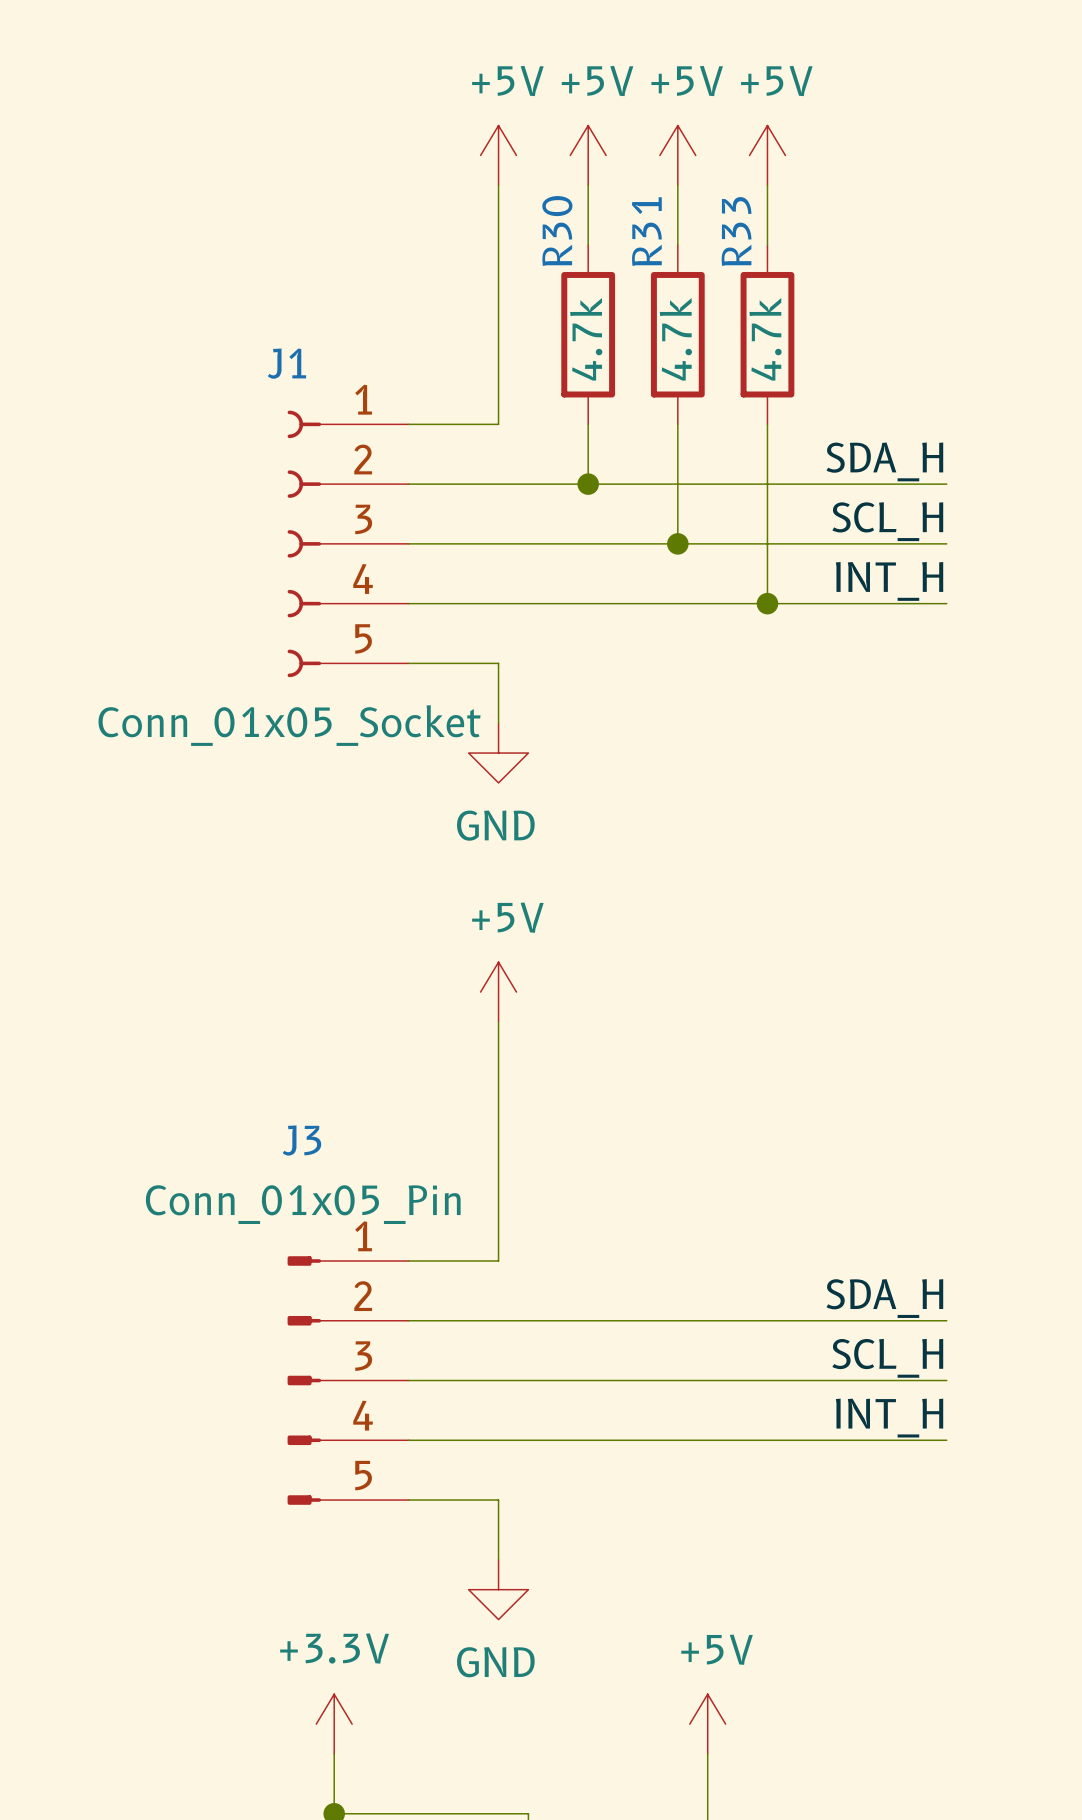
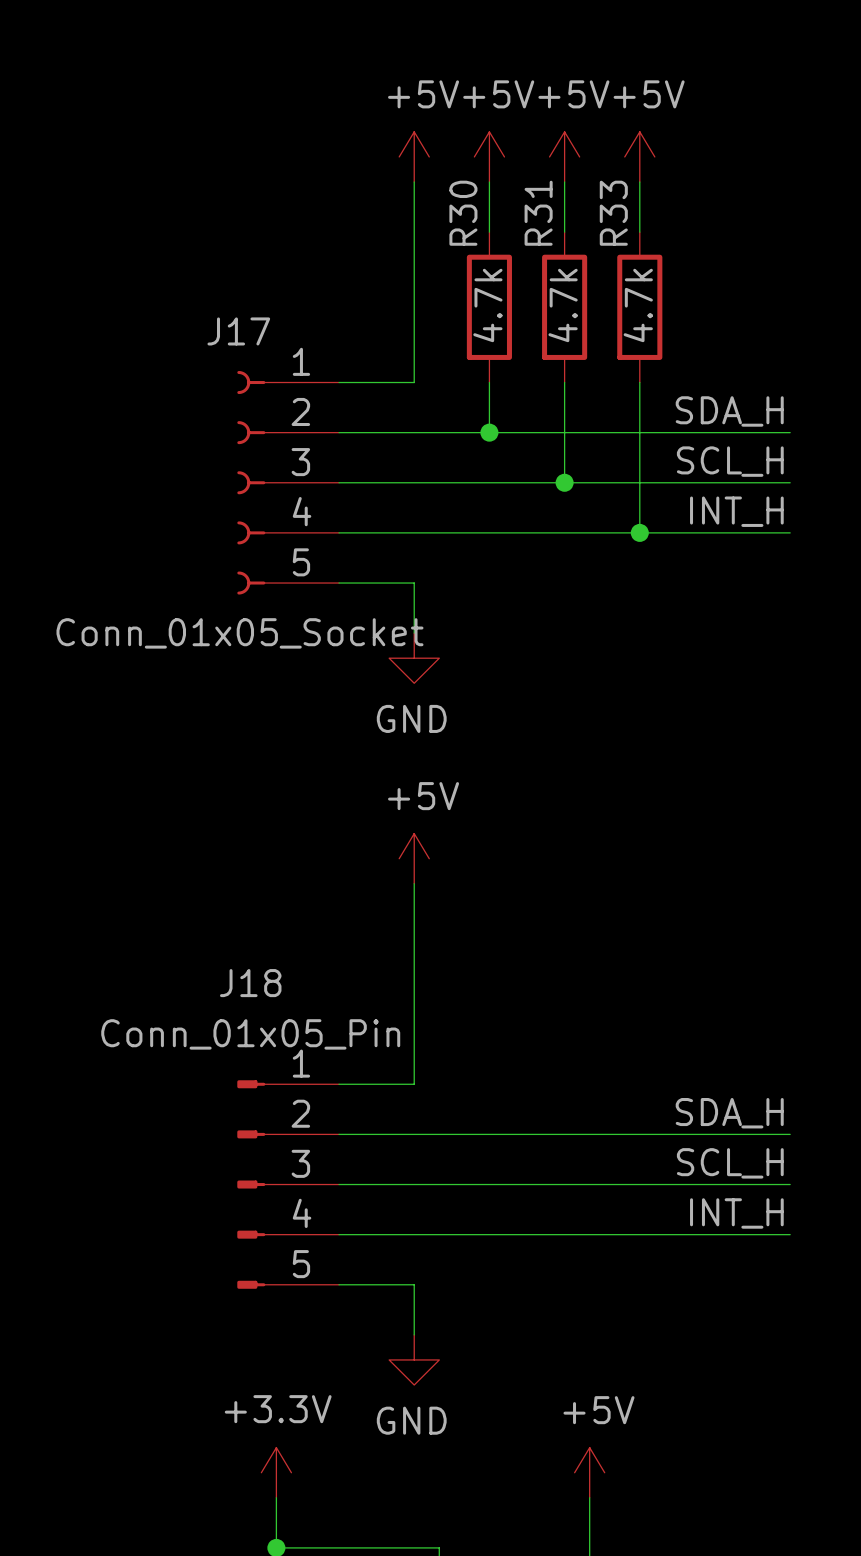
J1 name: J1 (286, 363) -> J17 (238, 331)
J3 name: J3 (301, 1140) -> J18 (250, 983)

